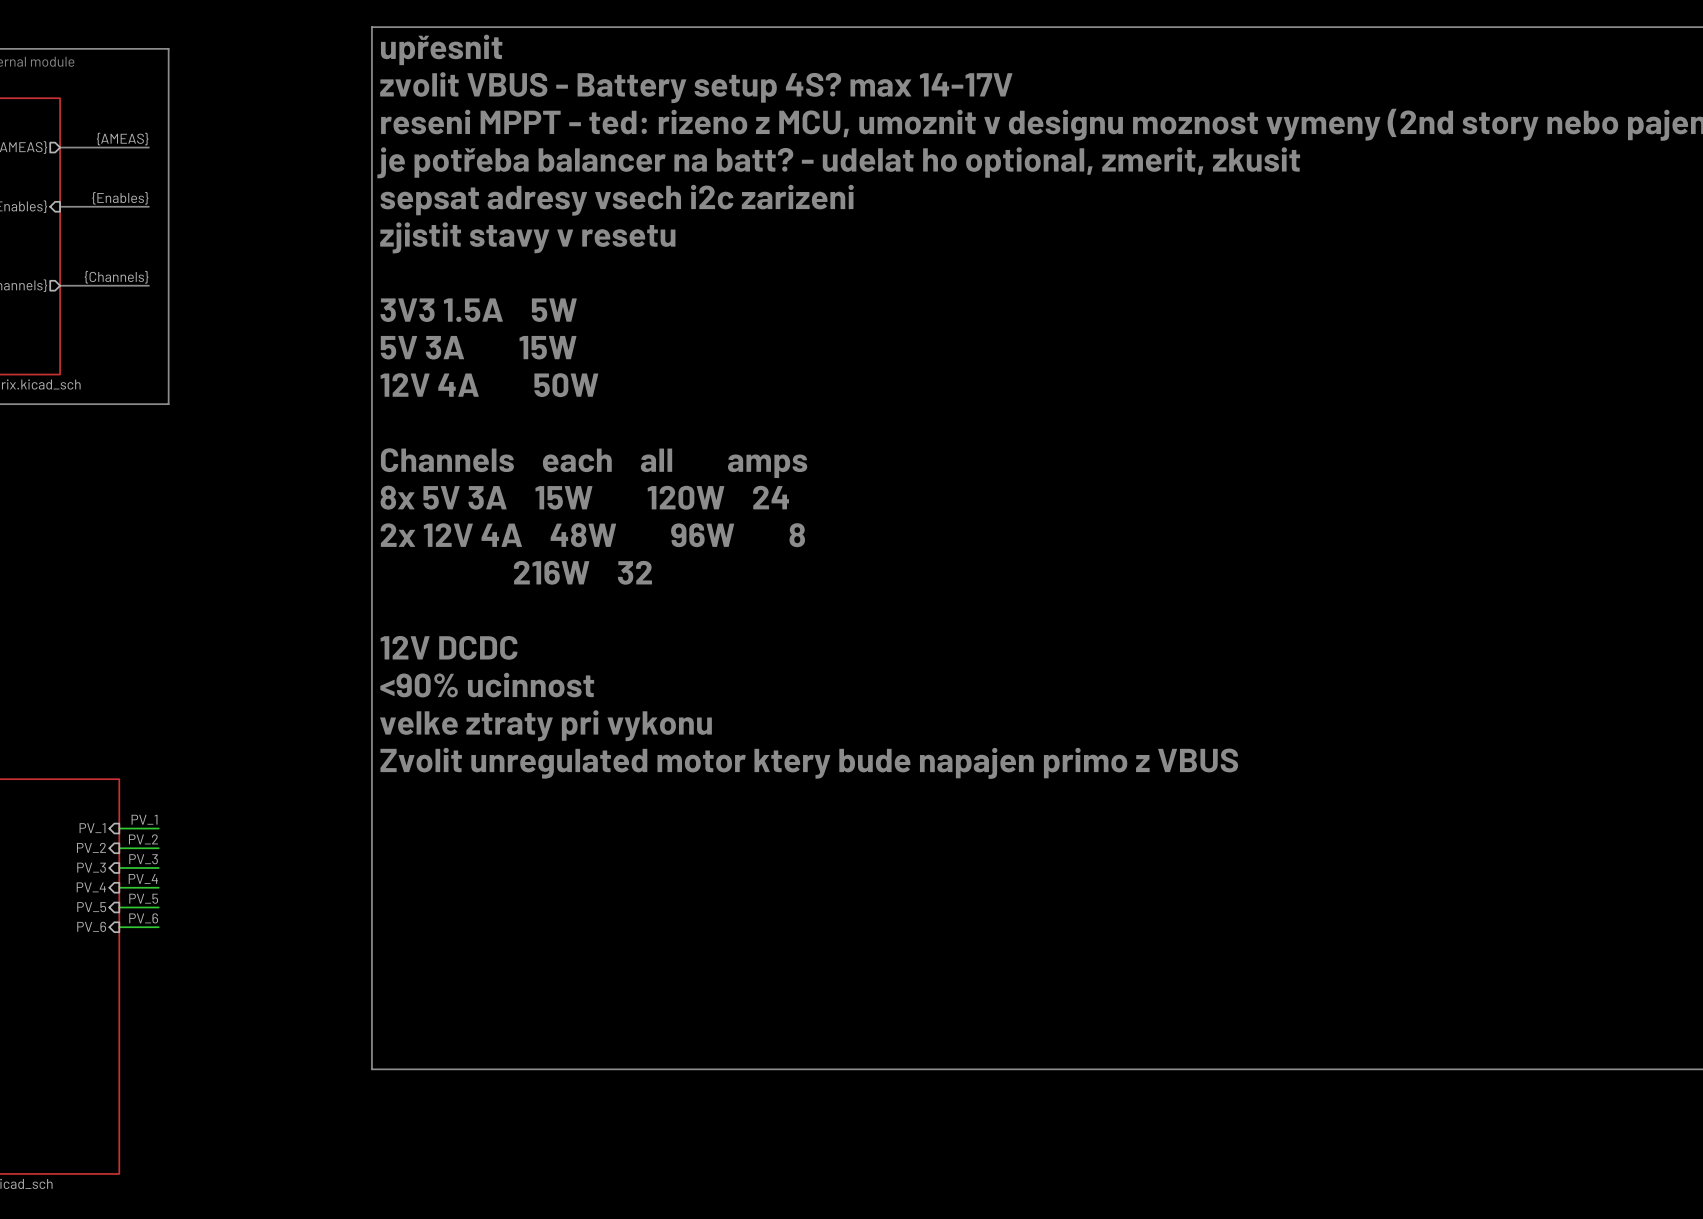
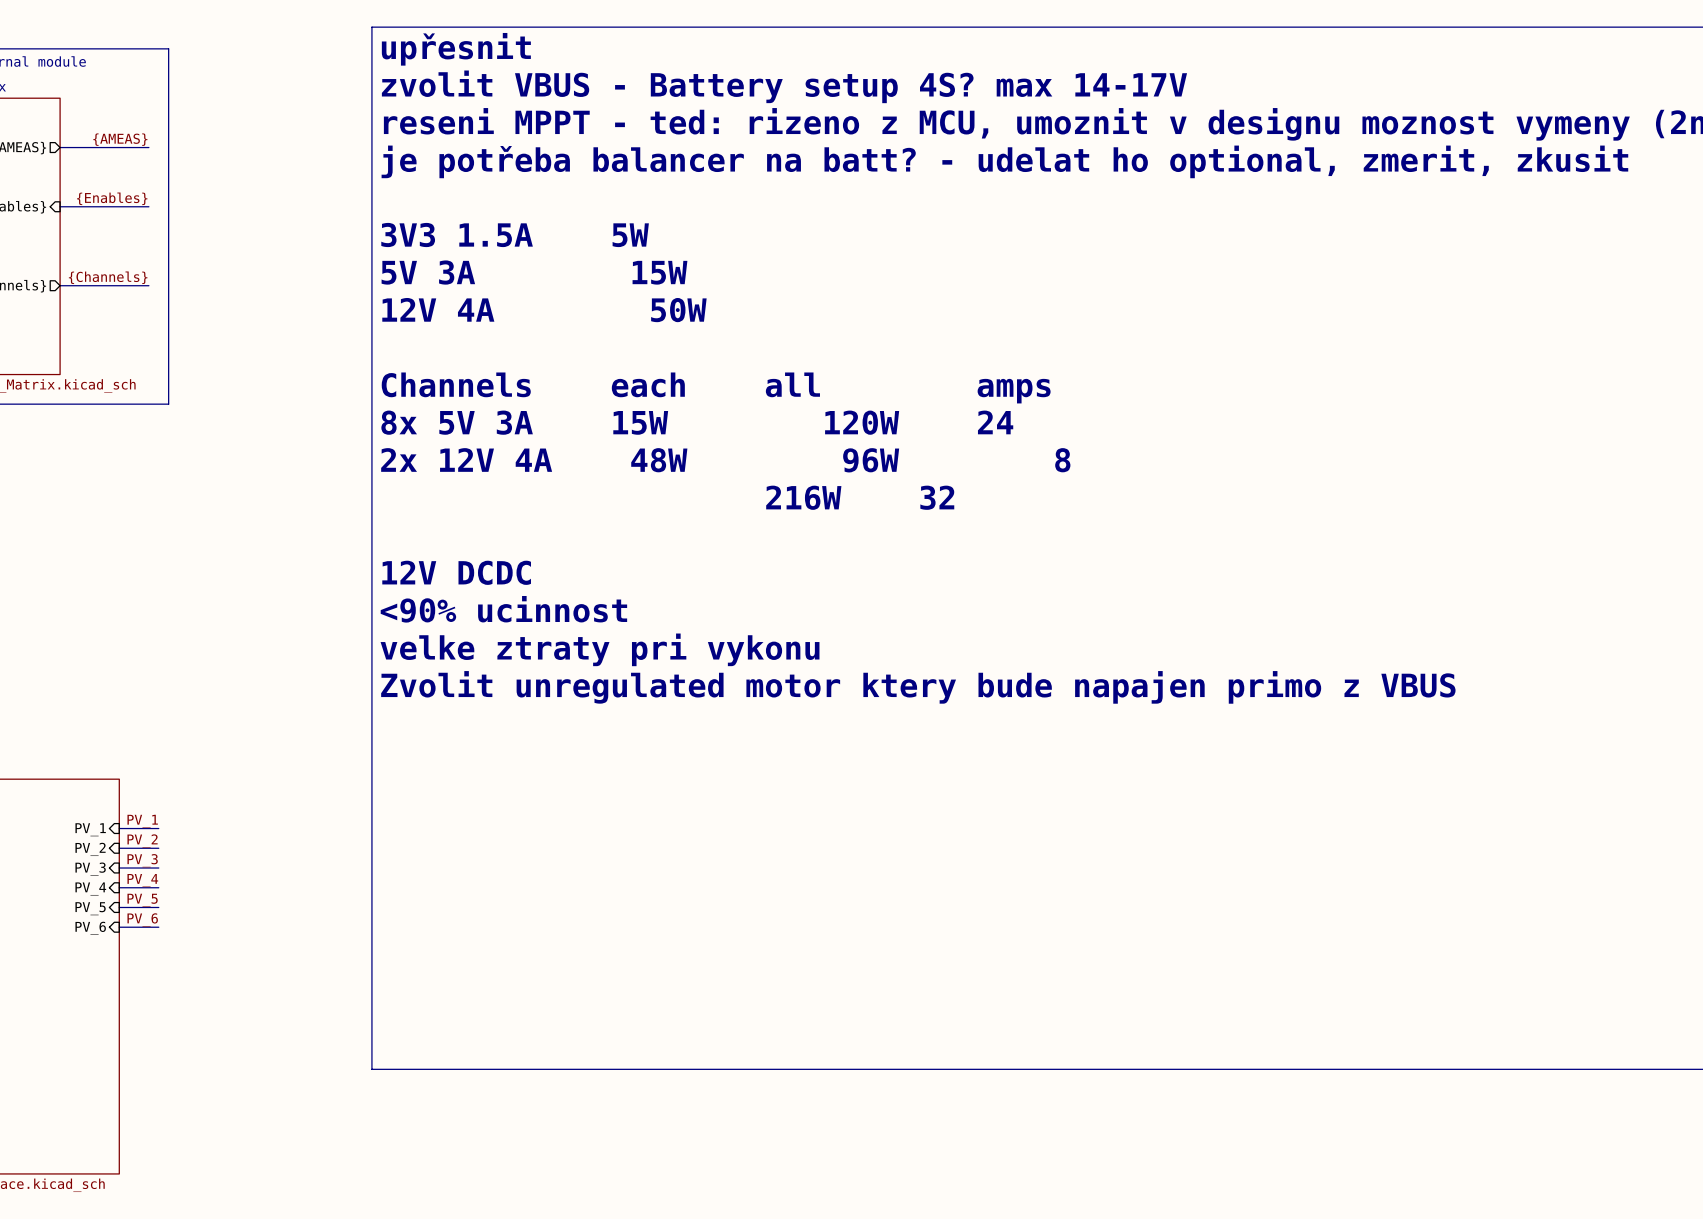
text: sepsat adresy vsech i2c zarizeni (617, 200) -> none
text: zjistit stavy v resetu (527, 237) -> 3V3 1.5A 5W (515, 235)
text: 3V3 1.5A 5W (478, 310) -> 12V 4A 50W (544, 310)
text position: 5V 3A 15W (478, 347) -> 5V 3A 15W (534, 272)
text: 12V 4A 50W (489, 385) -> Channels each all amps (716, 387)
text: none -> 8x 5V 3A 15W 120W 24 (697, 422)
text: Channels each all amps (594, 463) -> 2x 12V 4A 48W 96W 8 (725, 460)
text: 8x 5V 3A 15W 120W 24 (584, 497) -> 216W 32 (860, 497)
text: 2x 12V 4A 48W 96W 8 (592, 535) -> none
text: 216W 32 (582, 572) -> 12V DCDC (456, 572)
text: none -> <90% ucinnost (503, 609)
text: 12V DCDC (448, 647) -> velke ztraty pri vykonu (600, 649)
text: <90% ucinnost (487, 685) -> Zvolit unregulated motor ktery bude napajen primo z VBUS (918, 687)
text: velke ztraty pri vykonu (545, 725) -> none
text: Zvolit unregulated motor ktery bude napajen primo z VBUS (809, 763) -> none

